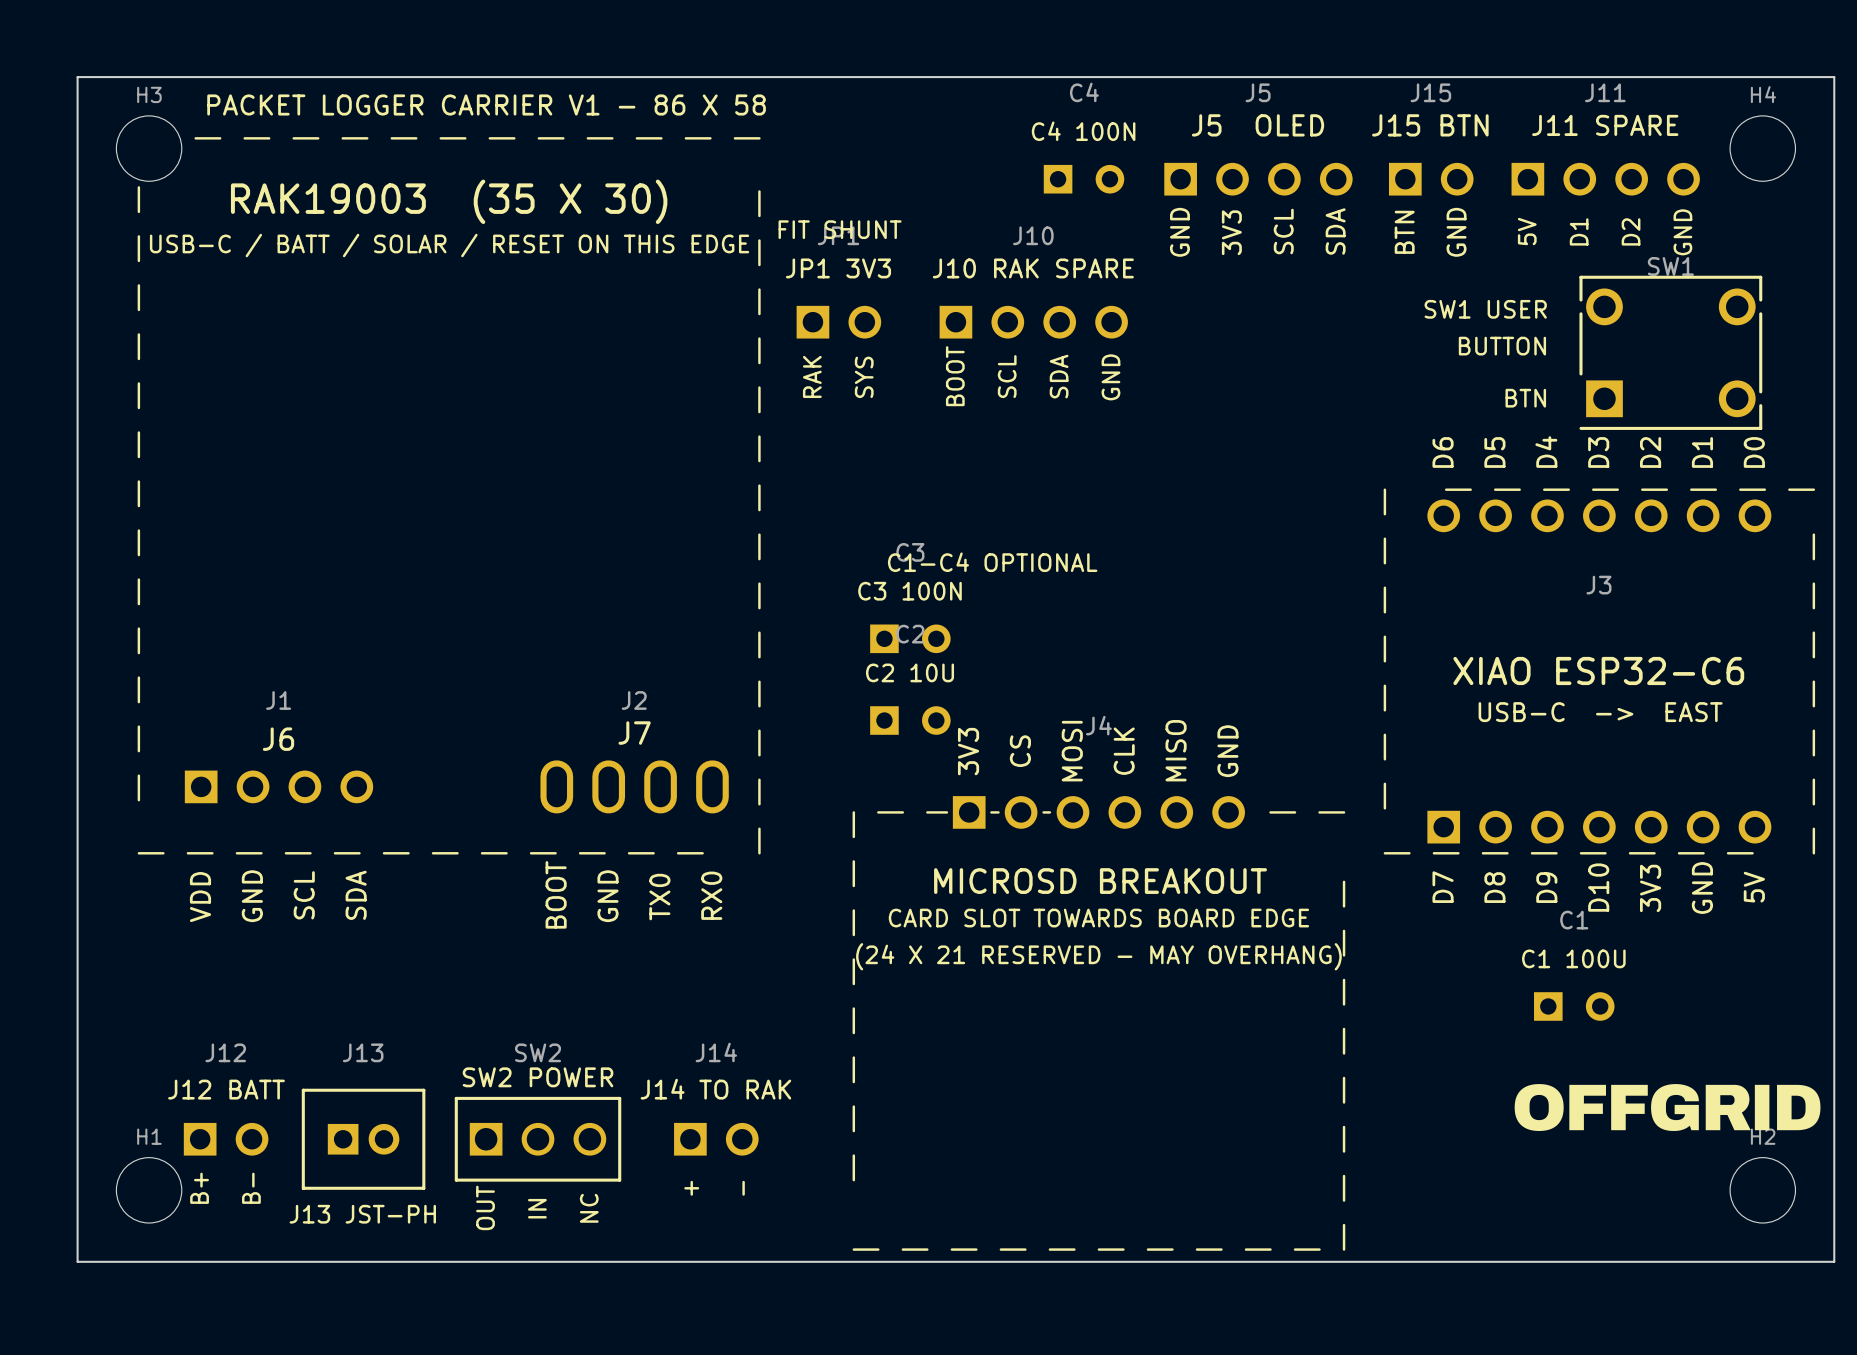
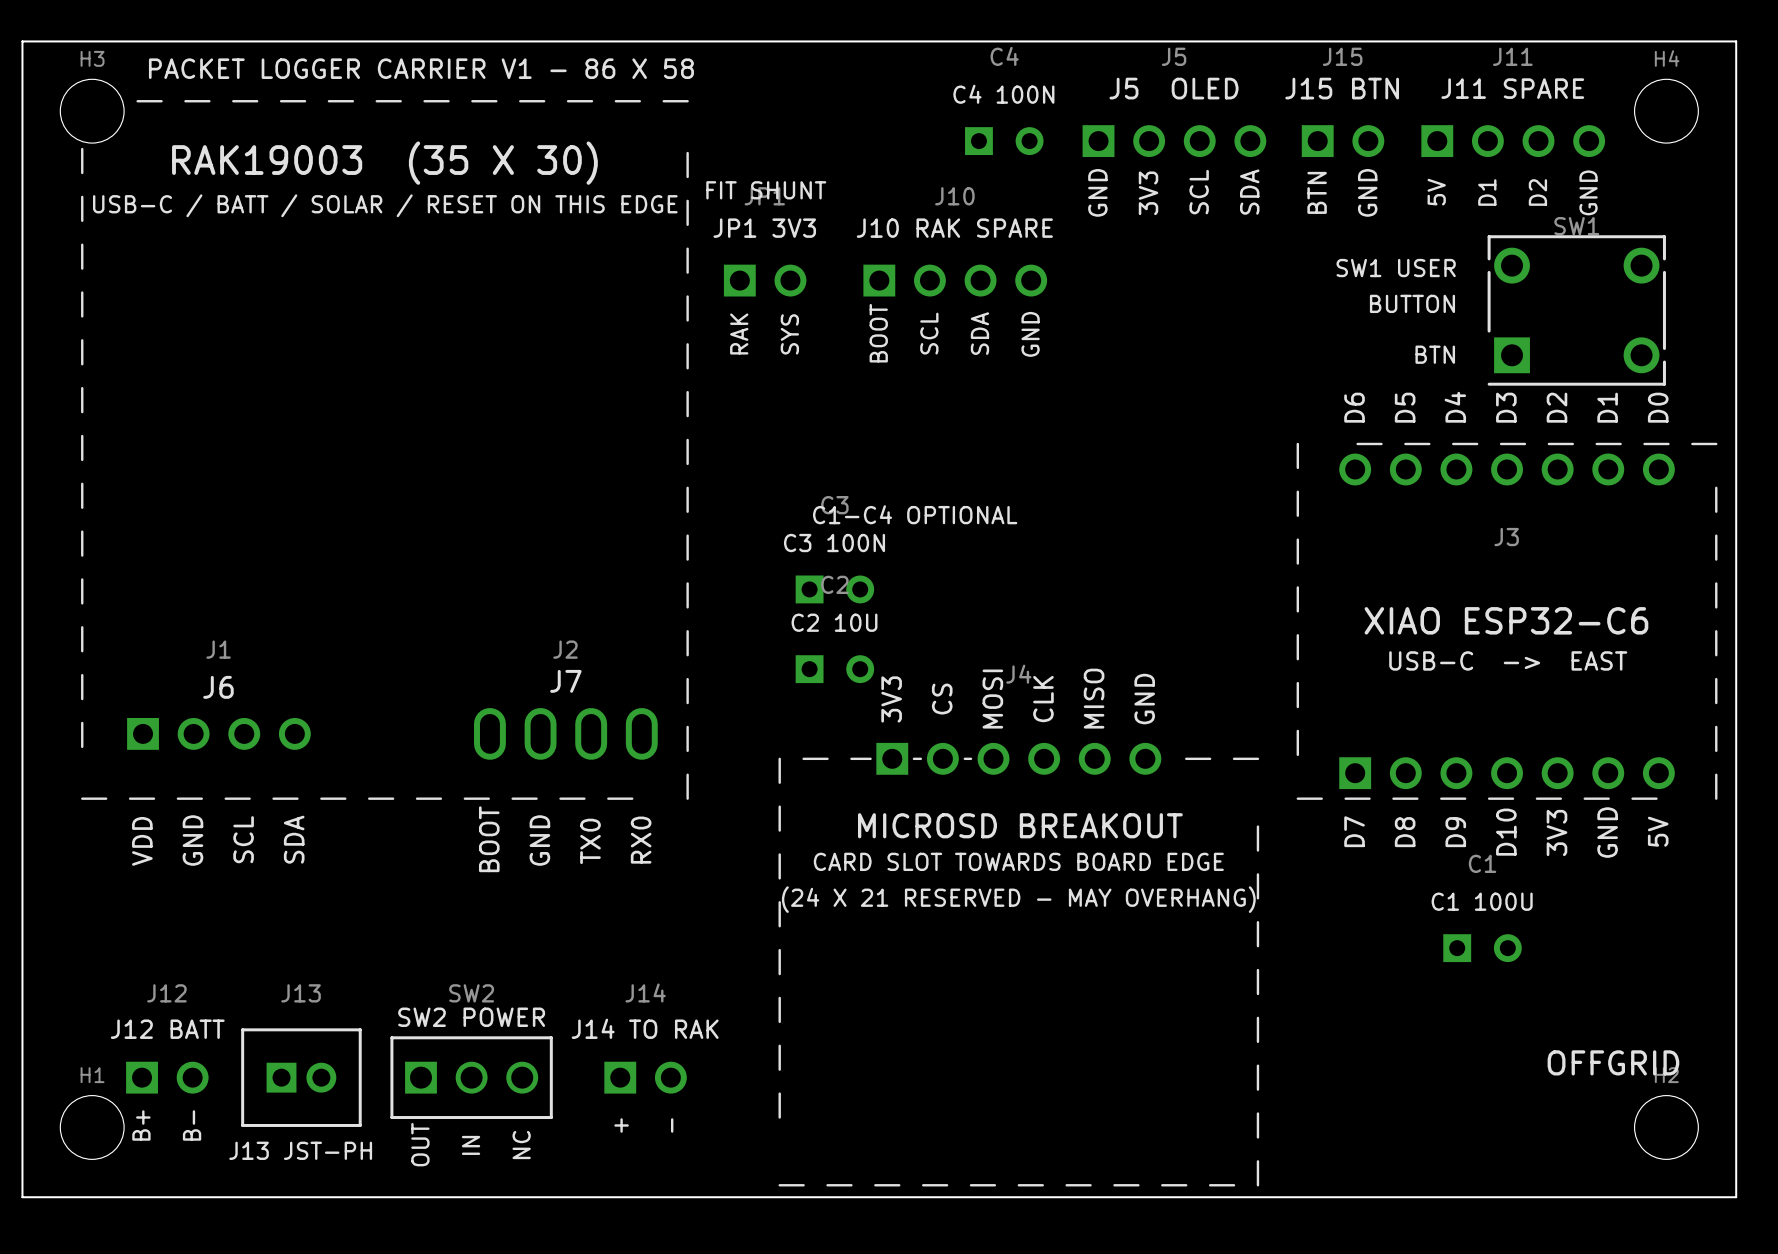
drawing: [1514, 1084, 1821, 1131] -> none
text: none -> OFFGRID (1613, 1062)

